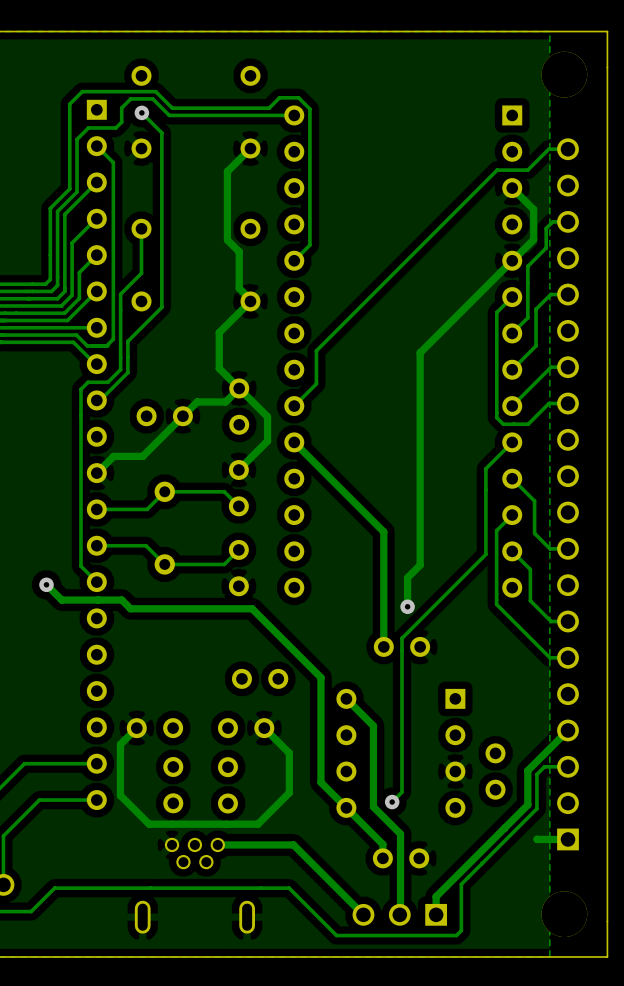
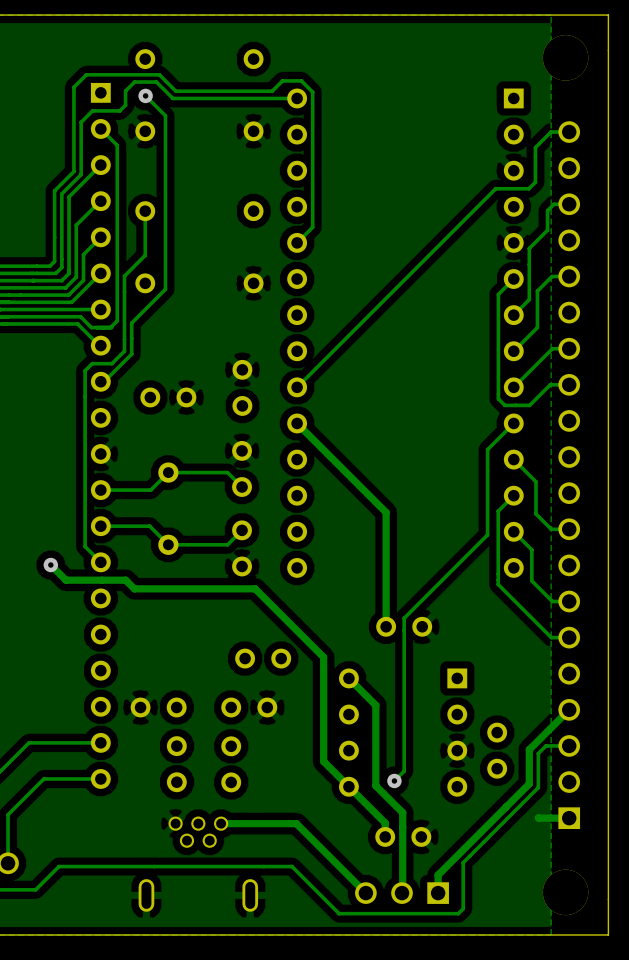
track: (250, 148) (227, 171) (227, 240) (239, 251) (239, 288) (250, 301) (219, 332) (219, 368) (267, 416) (267, 441) (238, 469) -> none
track: (549, 149) (527, 170) (497, 170) (316, 350) (316, 383) -> (550, 132) (535, 147) (535, 182) (528, 188) (495, 188) (319, 365)
track: (512, 188) (533, 209) (533, 239) (420, 352) (420, 565) (407, 577) (407, 606) -> none
track: (239, 388) (225, 401) (197, 401) (142, 456) (113, 456) (97, 473) -> none
via: (407, 606) -> none
track: (264, 728) (289, 753) (289, 792) (257, 824) (149, 824) (120, 795) (120, 744) (136, 728) -> none

